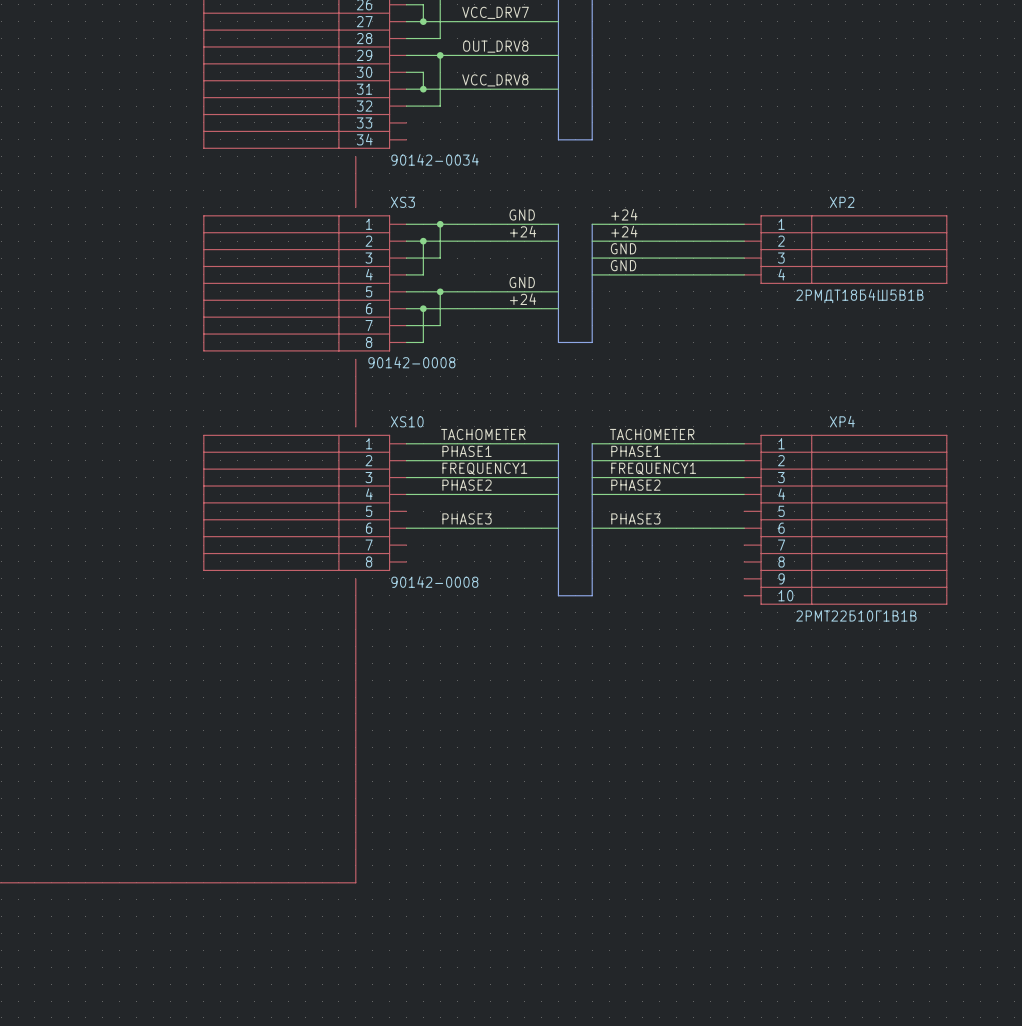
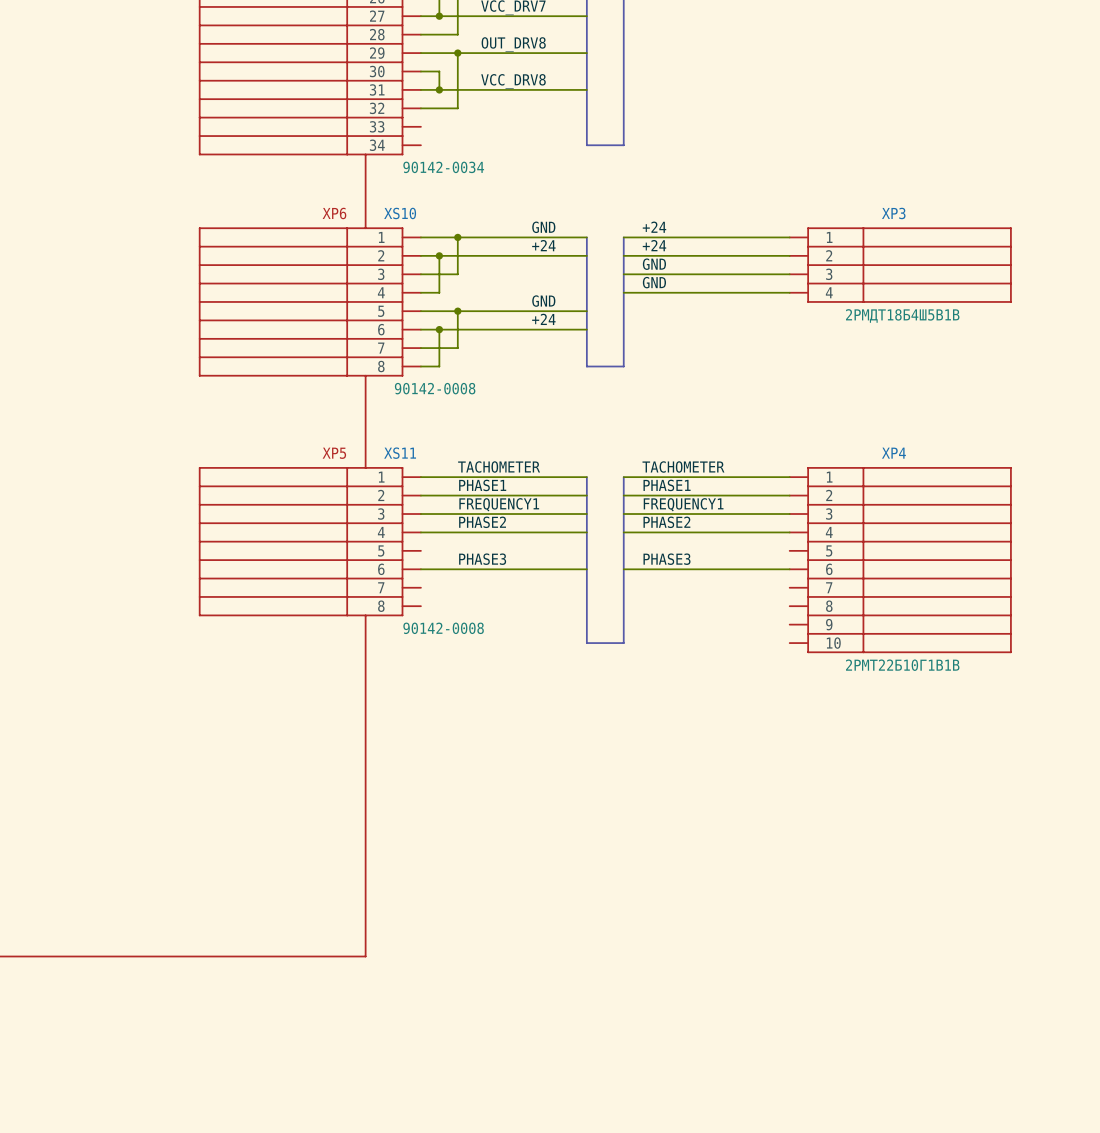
line: none -> (365, 154) (365, 163)
text: none -> XP6 (334, 213)
XS3 name: XS3 (402, 202) -> XS10 (400, 213)
XP2 name: XP2 (842, 202) -> XP3 (893, 213)
line: none -> (365, 219) (365, 228)
line: none -> (365, 375) (365, 384)
text: none -> XP5 (334, 453)
XS10 name: XS10 (407, 421) -> XS11 (400, 453)
line: none -> (365, 458) (365, 467)
line: none -> (365, 615) (365, 624)

